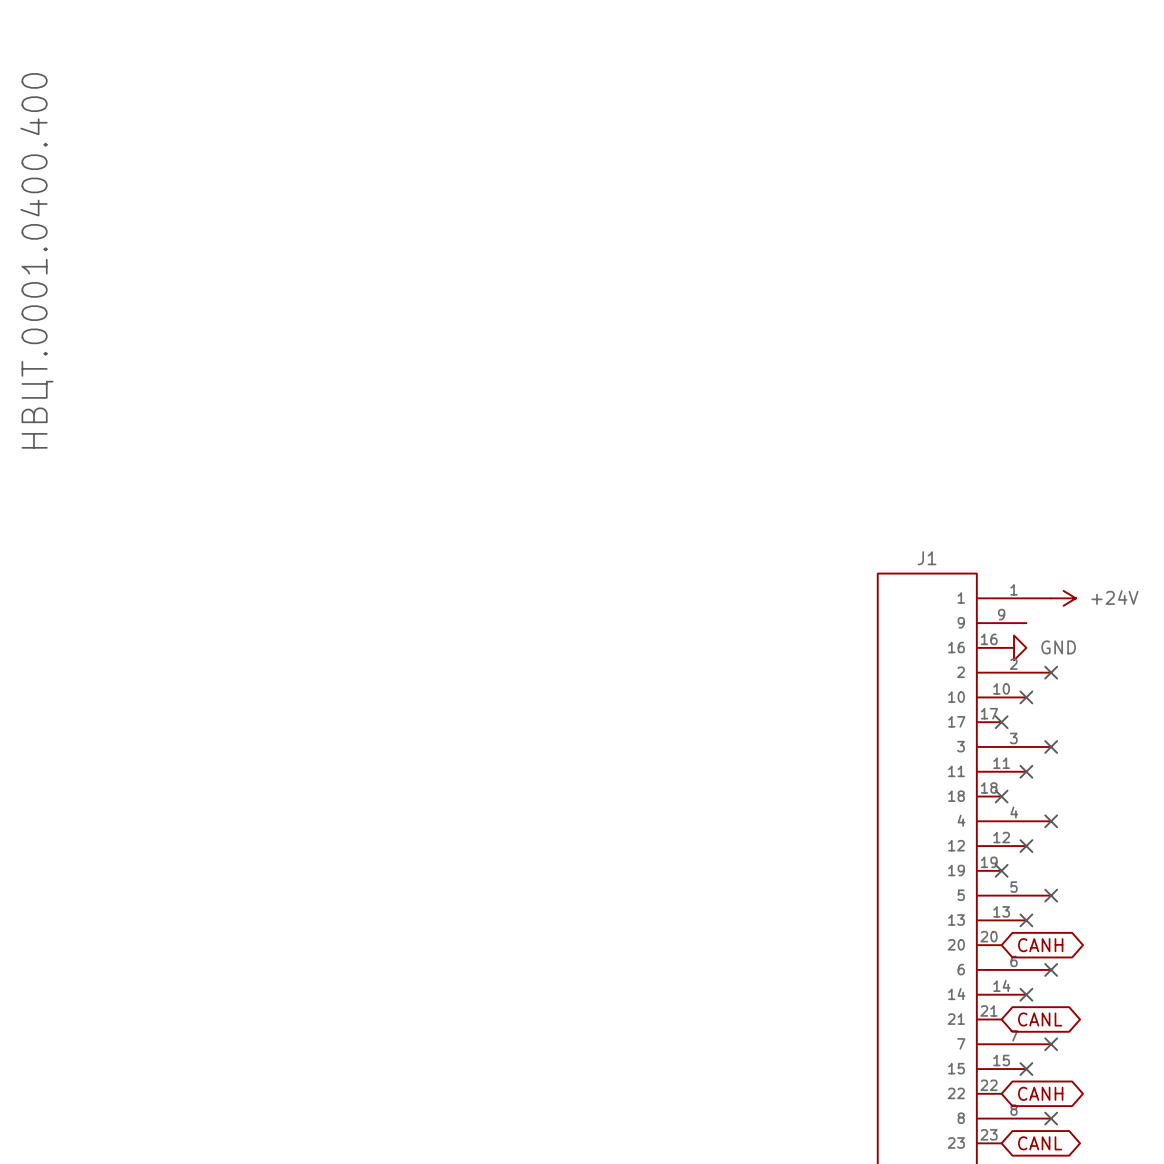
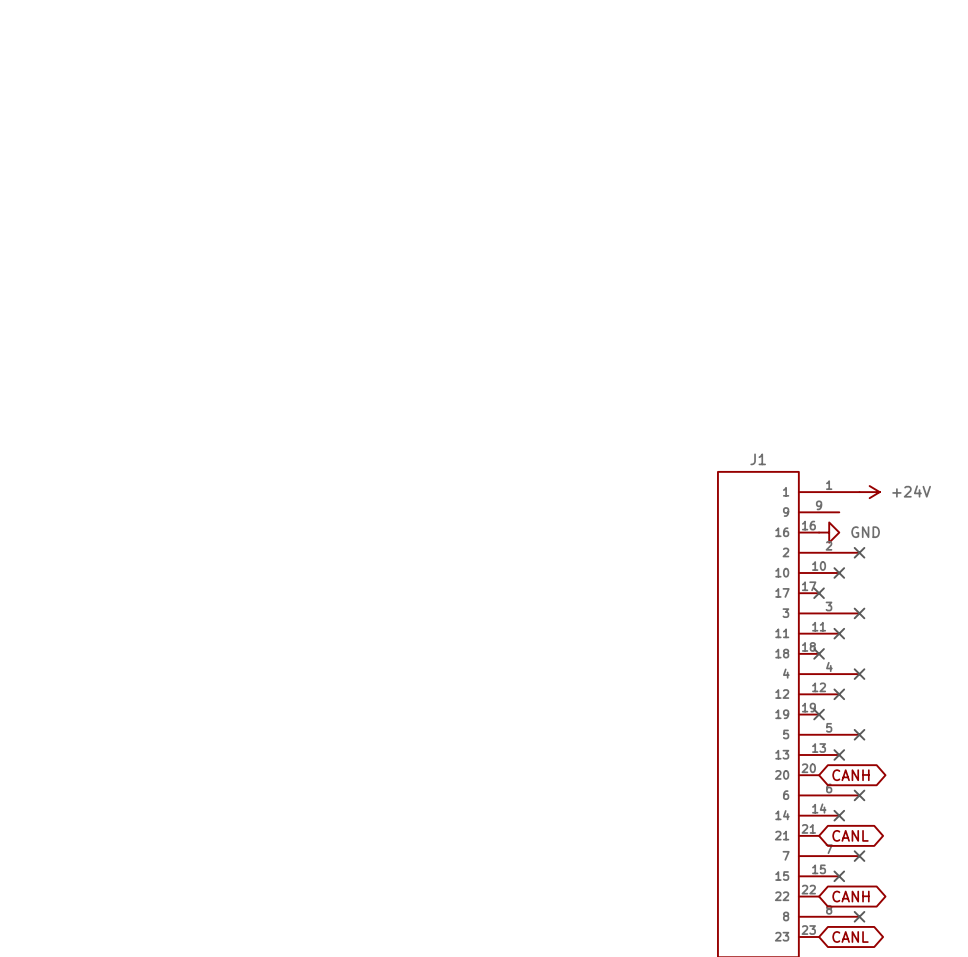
text: НВЦТ.0001.0400.400 (36, 260) -> none

